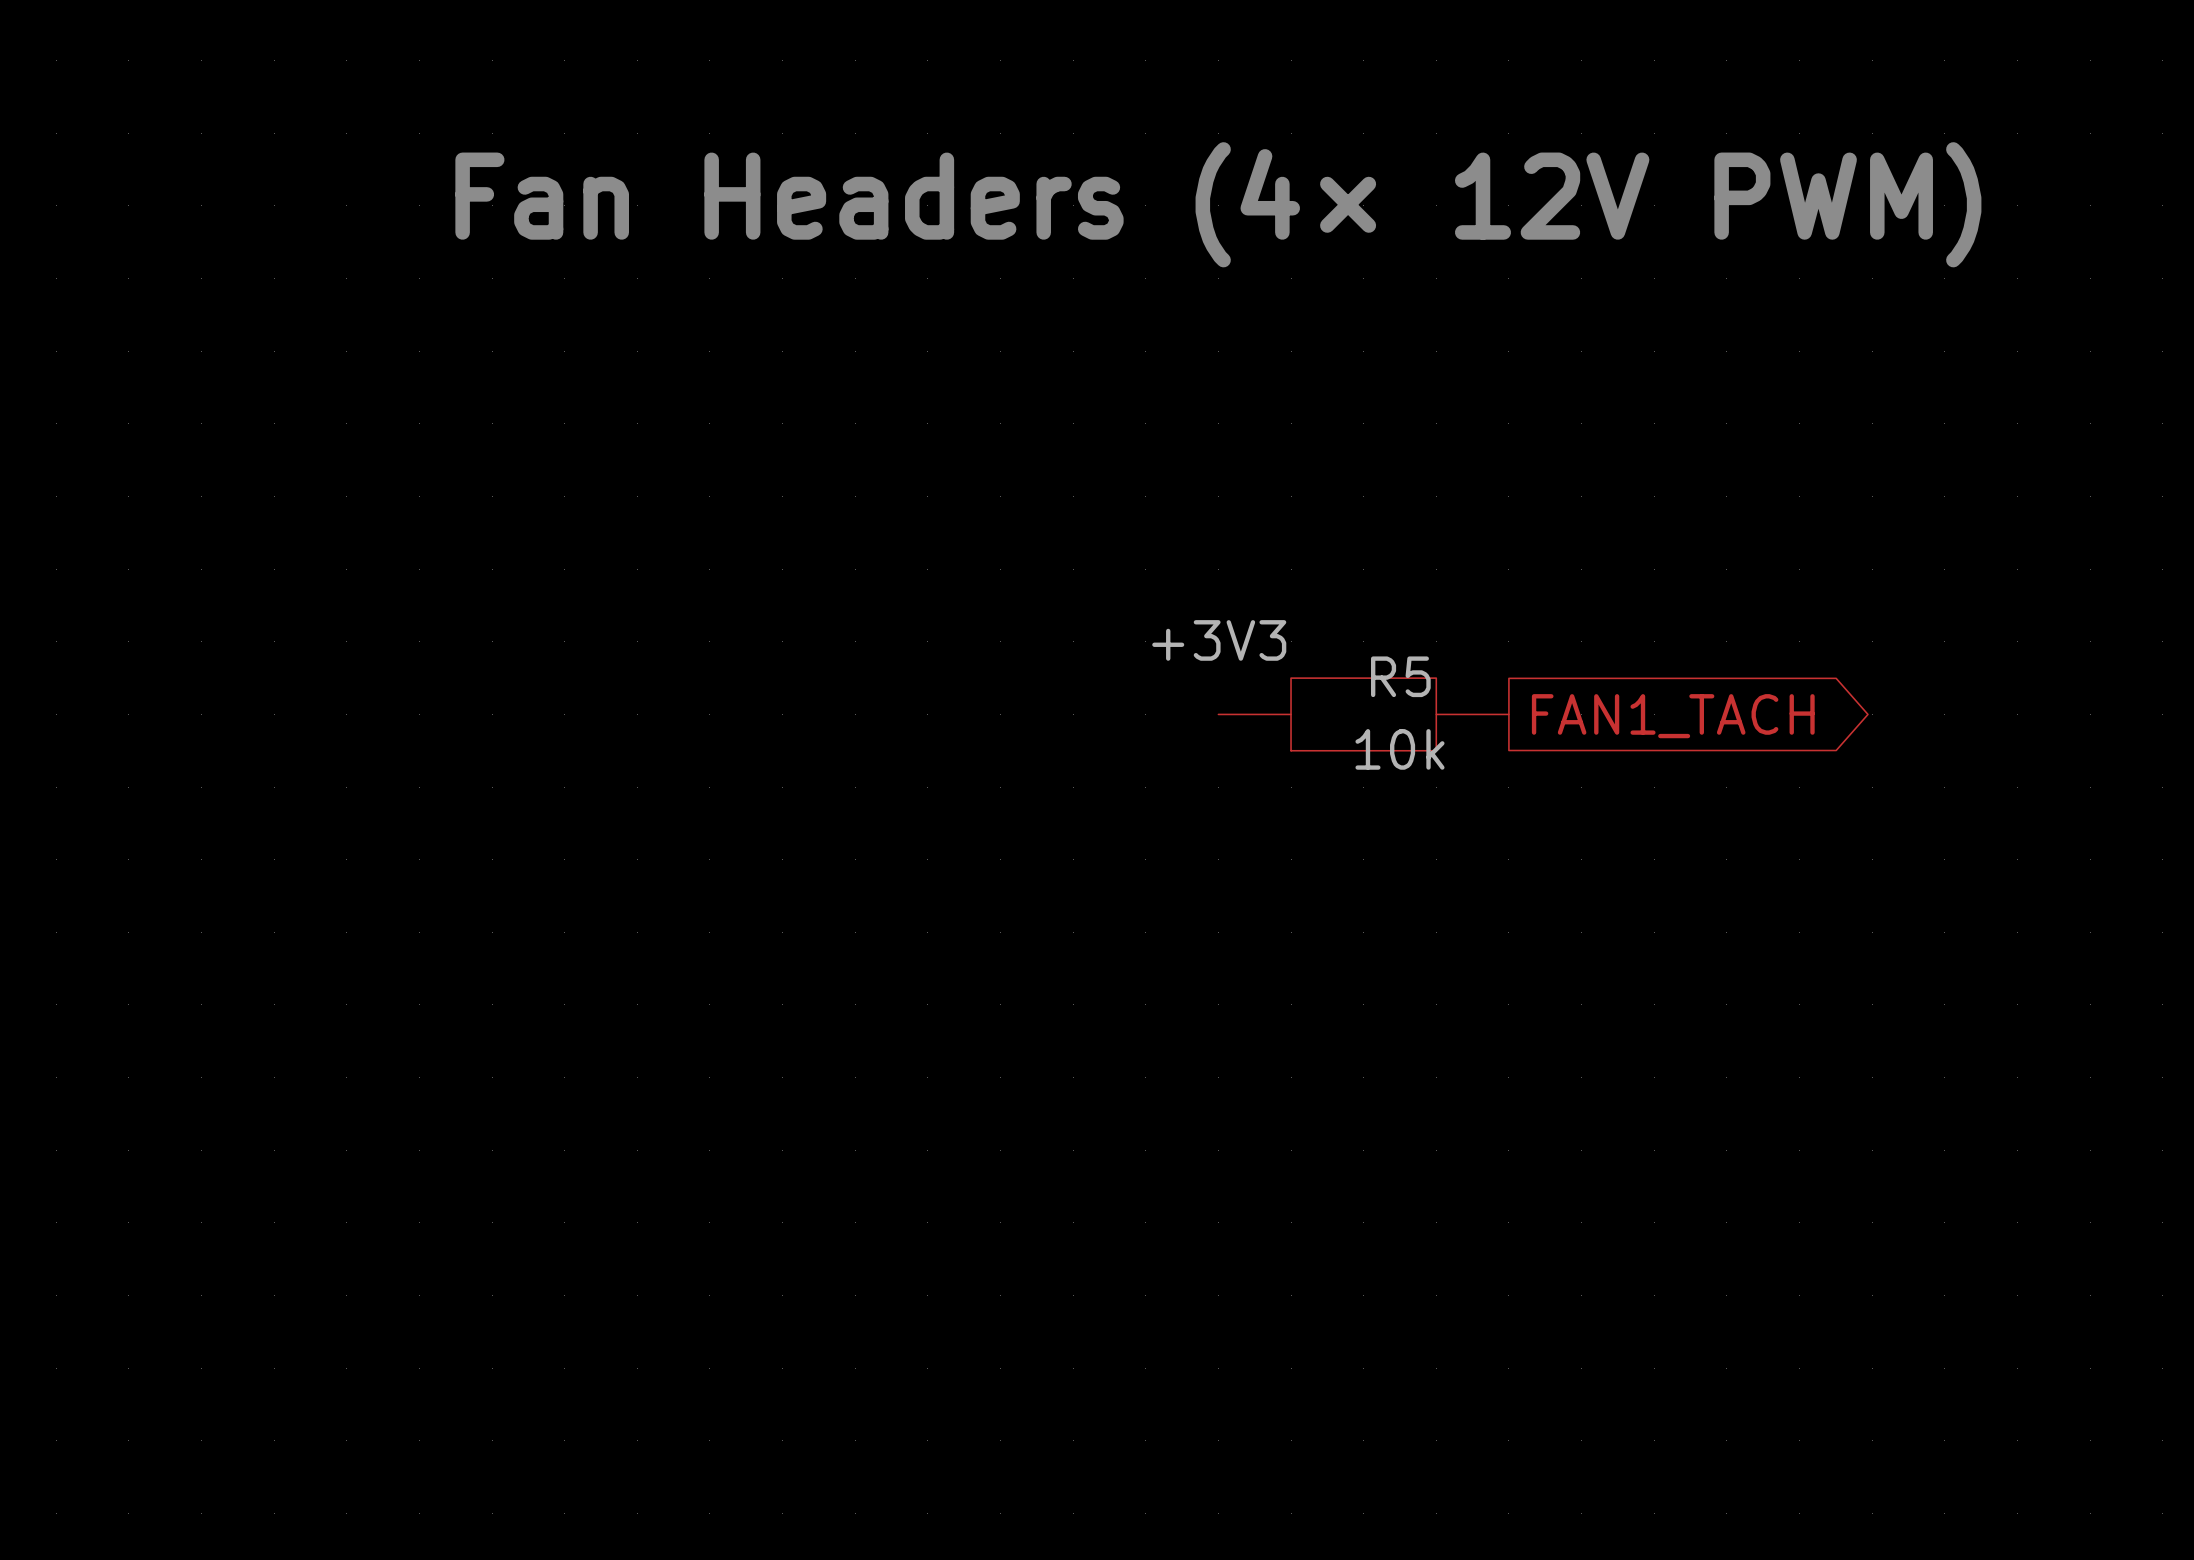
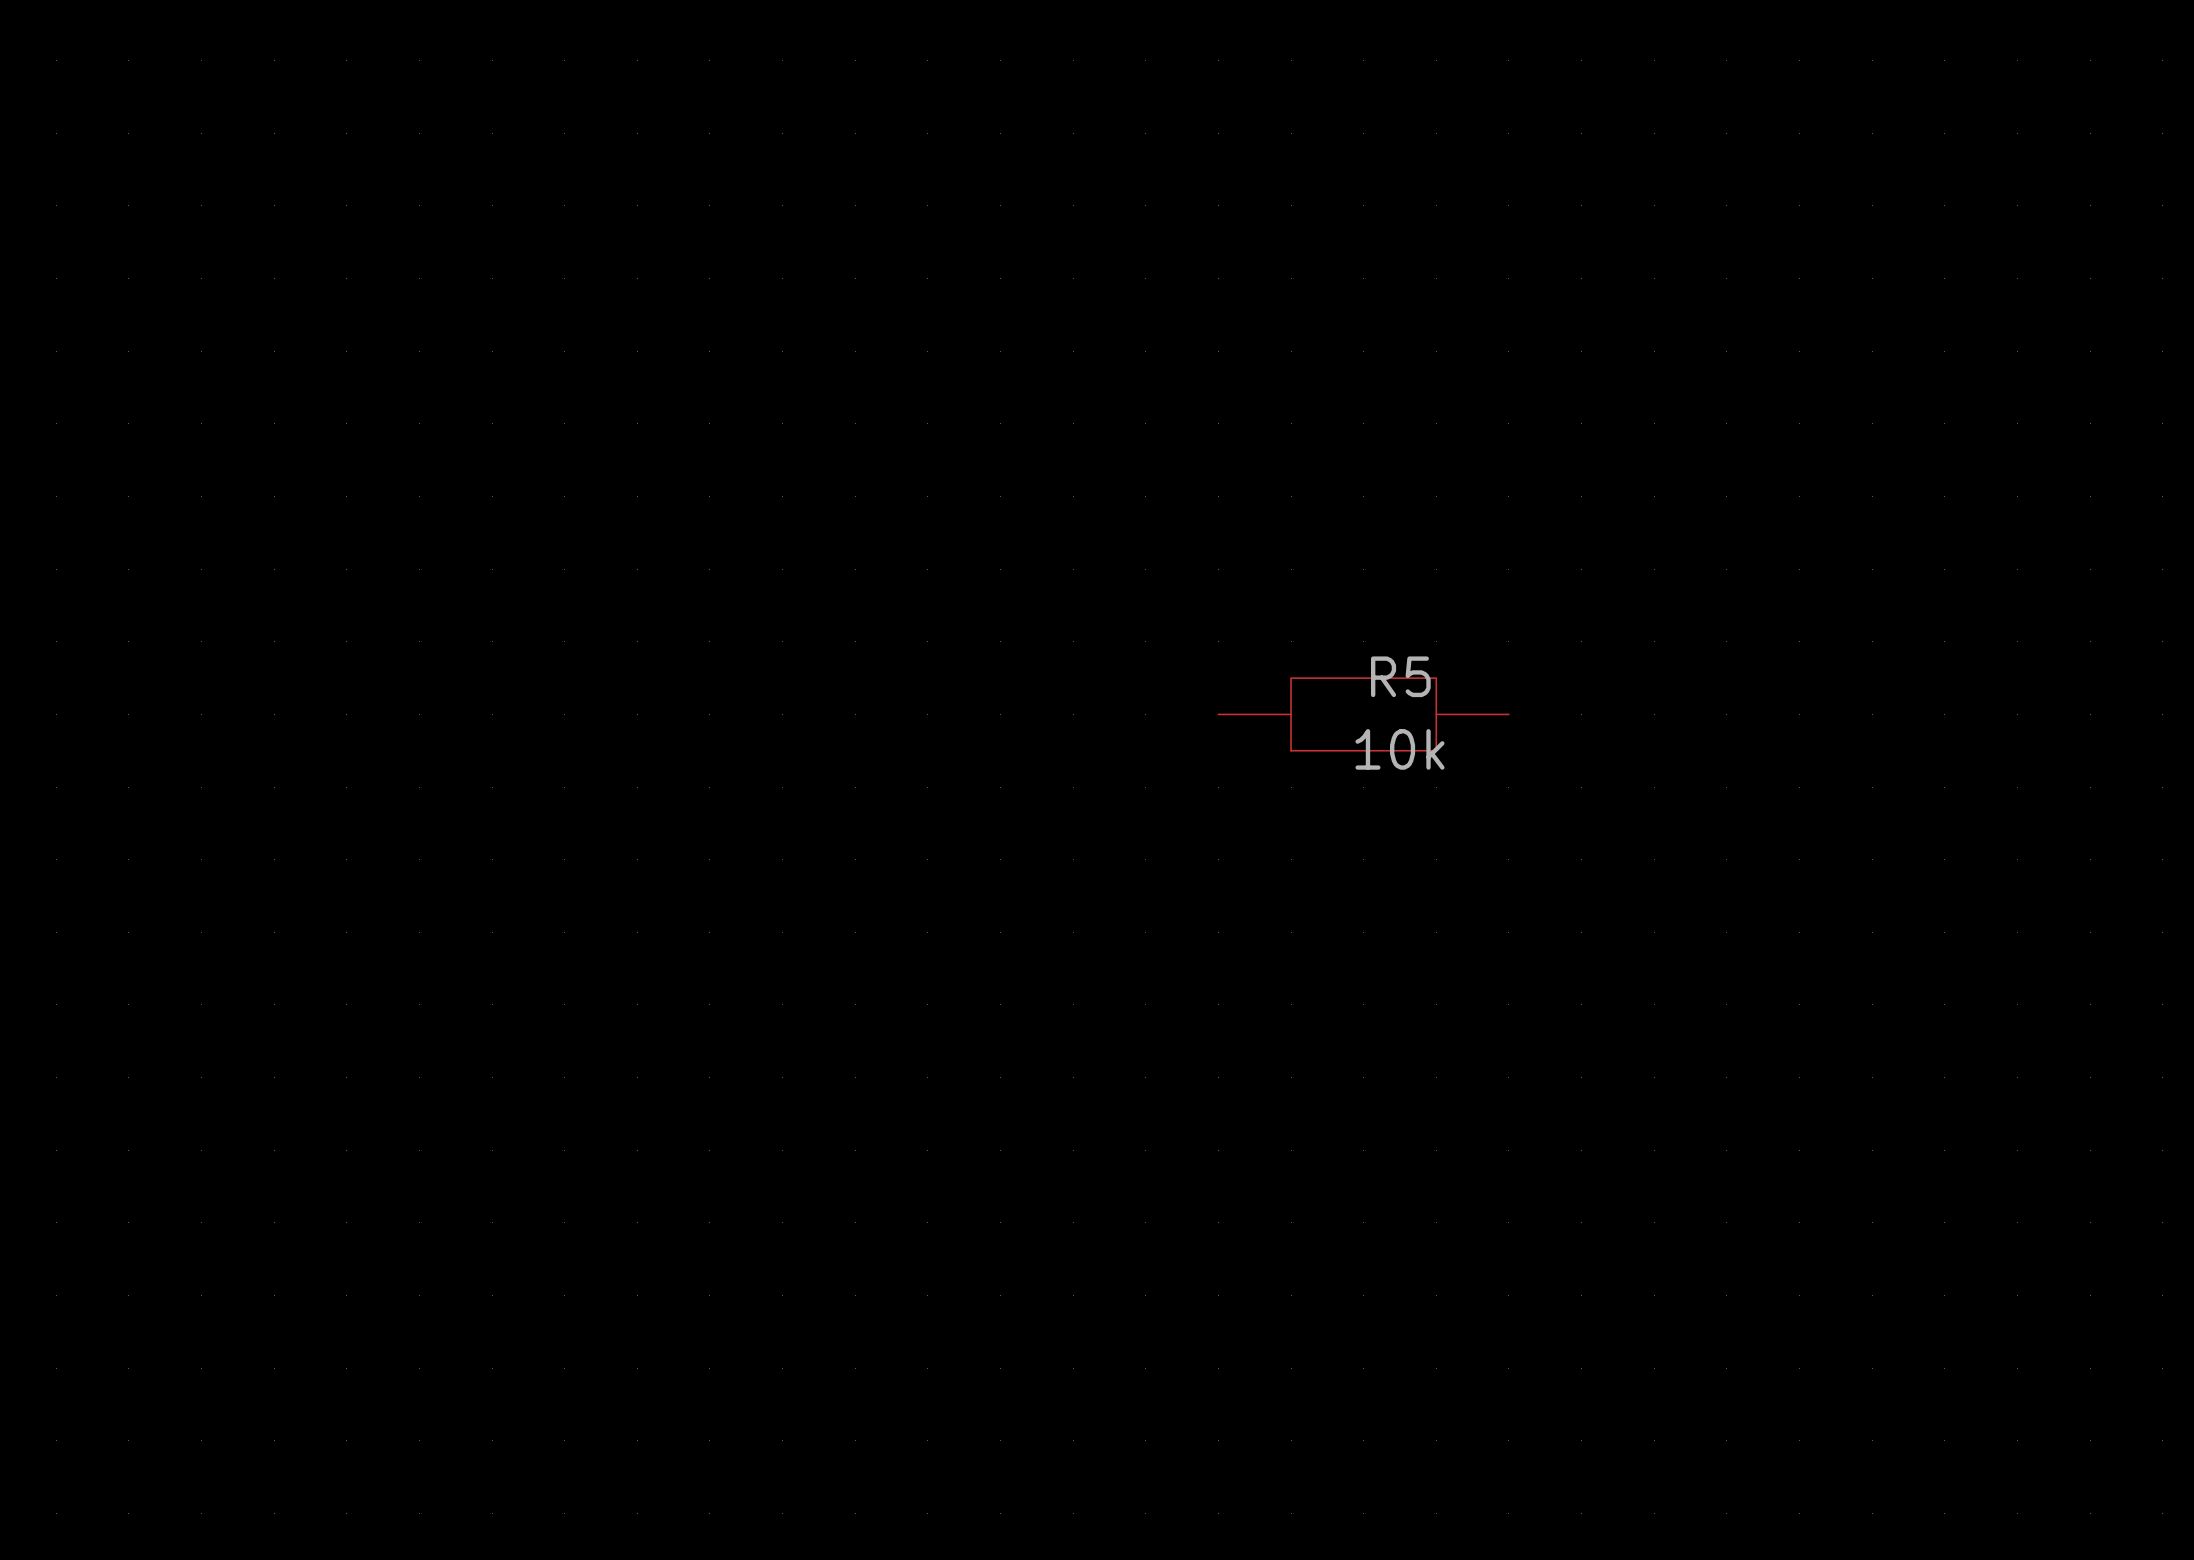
text: Fan Headers (4× 12V PWM) (1218, 204) -> none
power symbol: +3V3 (1219, 640) -> none
global label: FAN1_TACH (1673, 716) -> none

